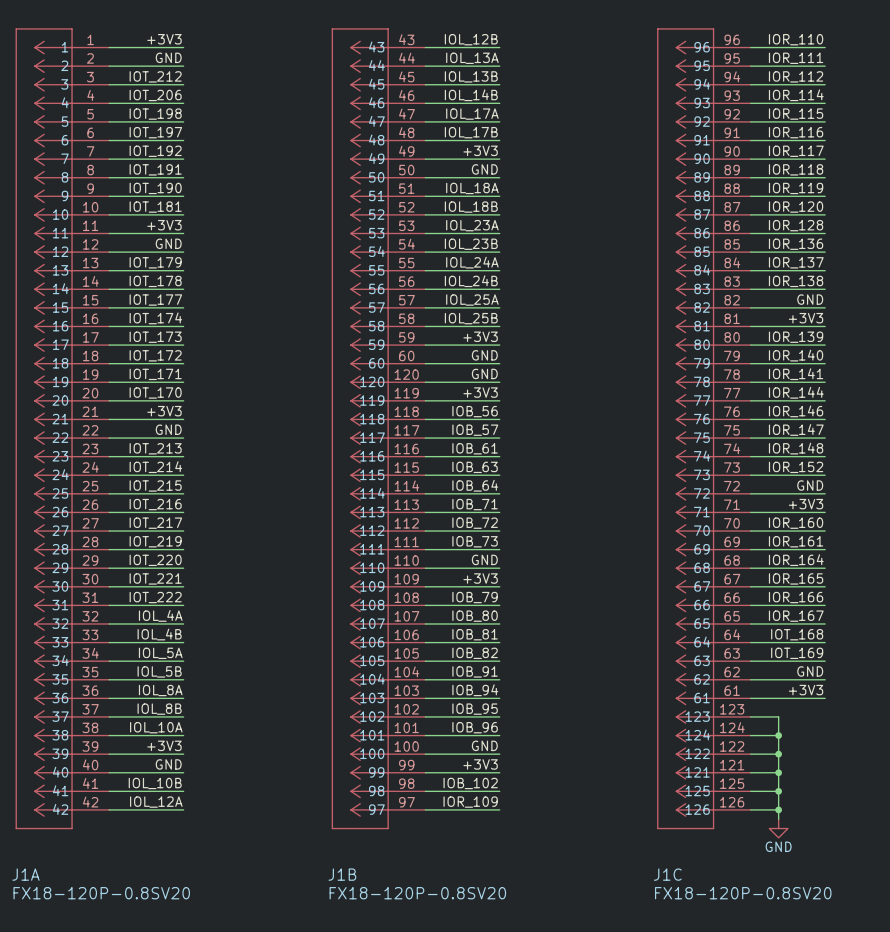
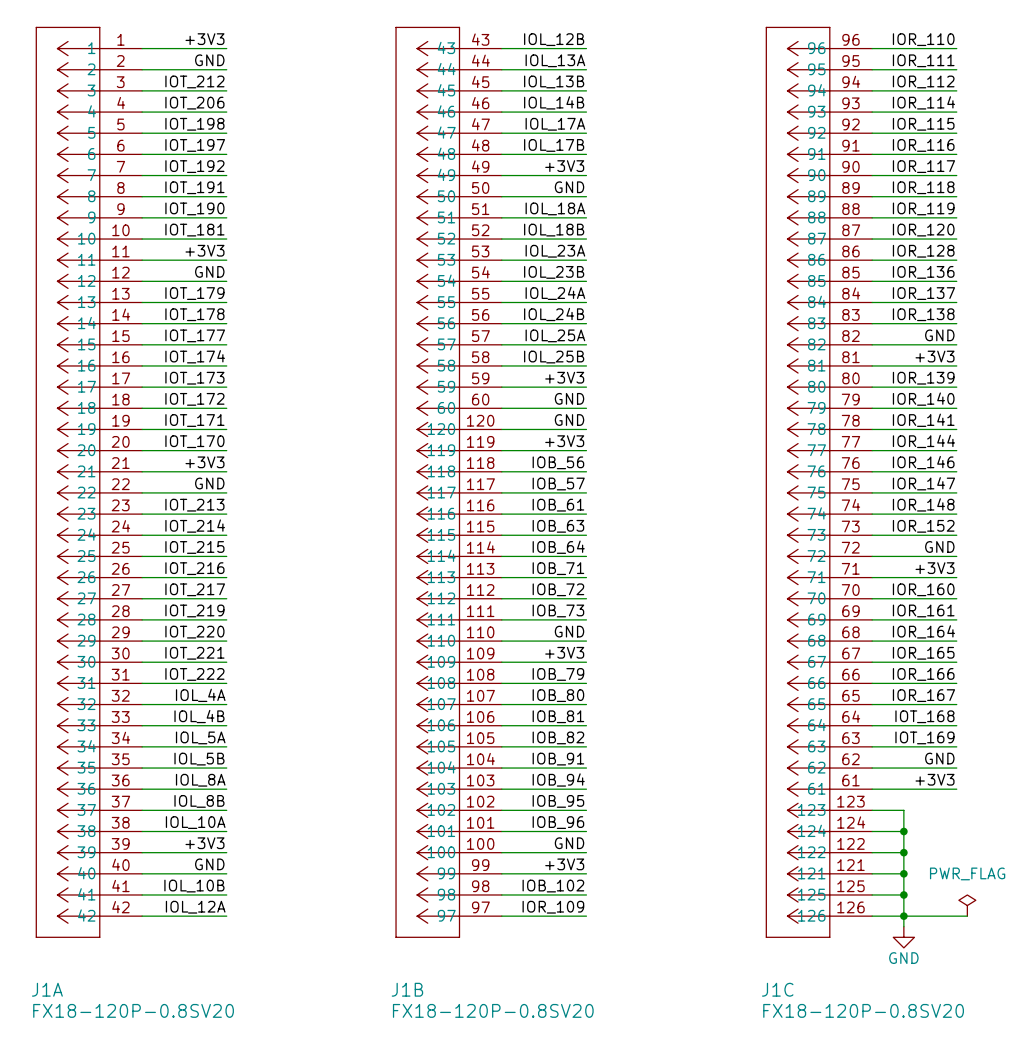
power symbol: none -> PWR_FLAG (967, 905)
wire: none -> (903, 916) (967, 916)

